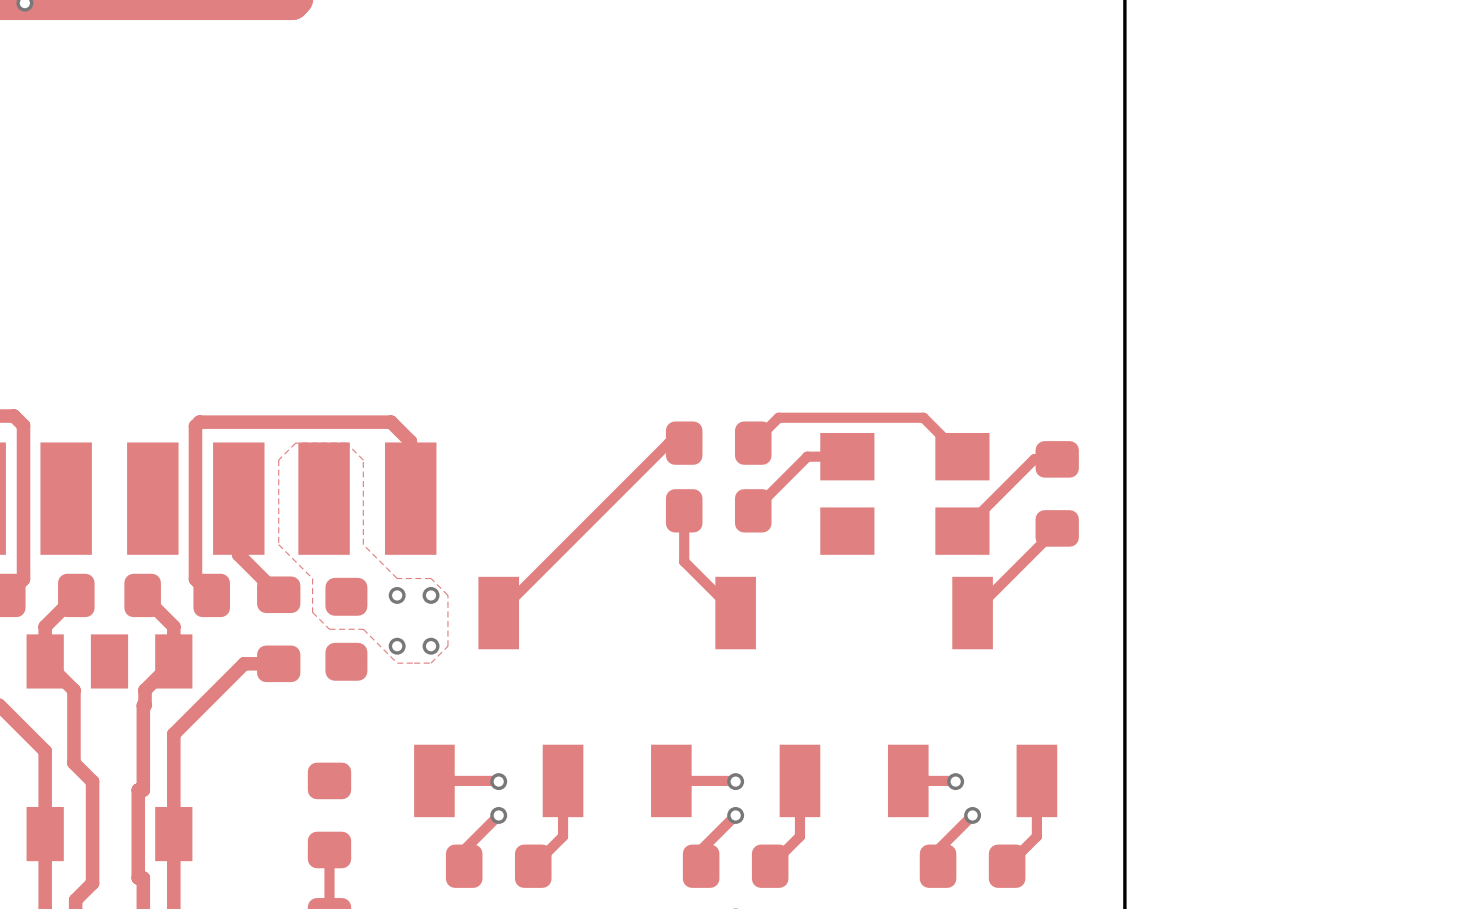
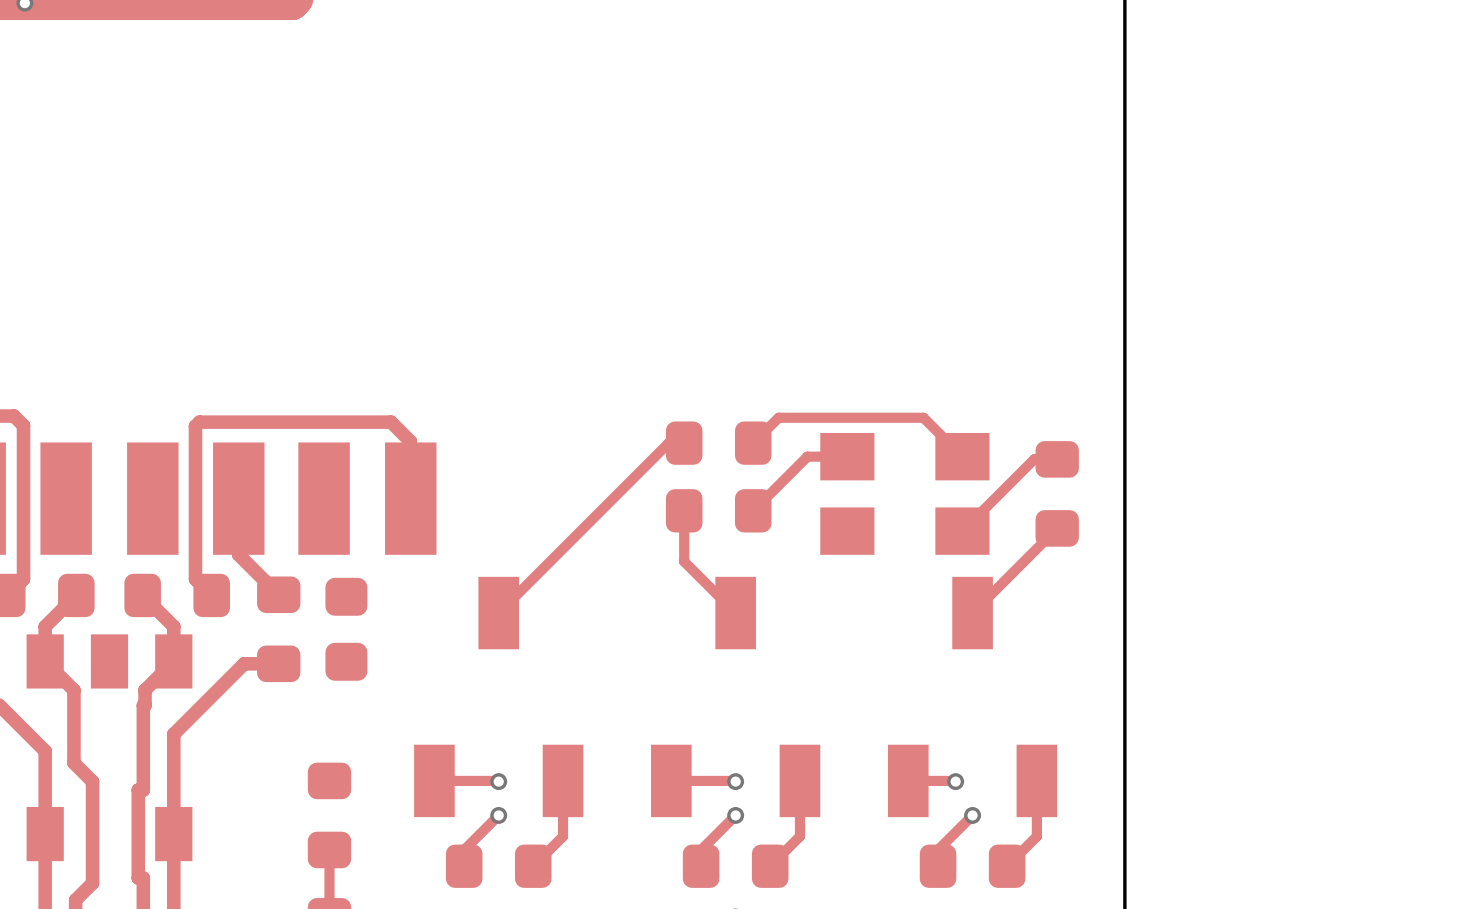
top zone outline: (346, 443) (363, 460) (363, 544) (397, 578) (431, 578) (447, 595) (447, 646) (431, 663) (397, 663) (363, 629) (329, 629) (312, 612) (312, 578) (278, 544) (278, 460) (295, 443) (346, 443) -> none
via: (397, 595) -> none
via: (431, 595) -> none
via: (397, 646) -> none
via: (431, 646) -> none

